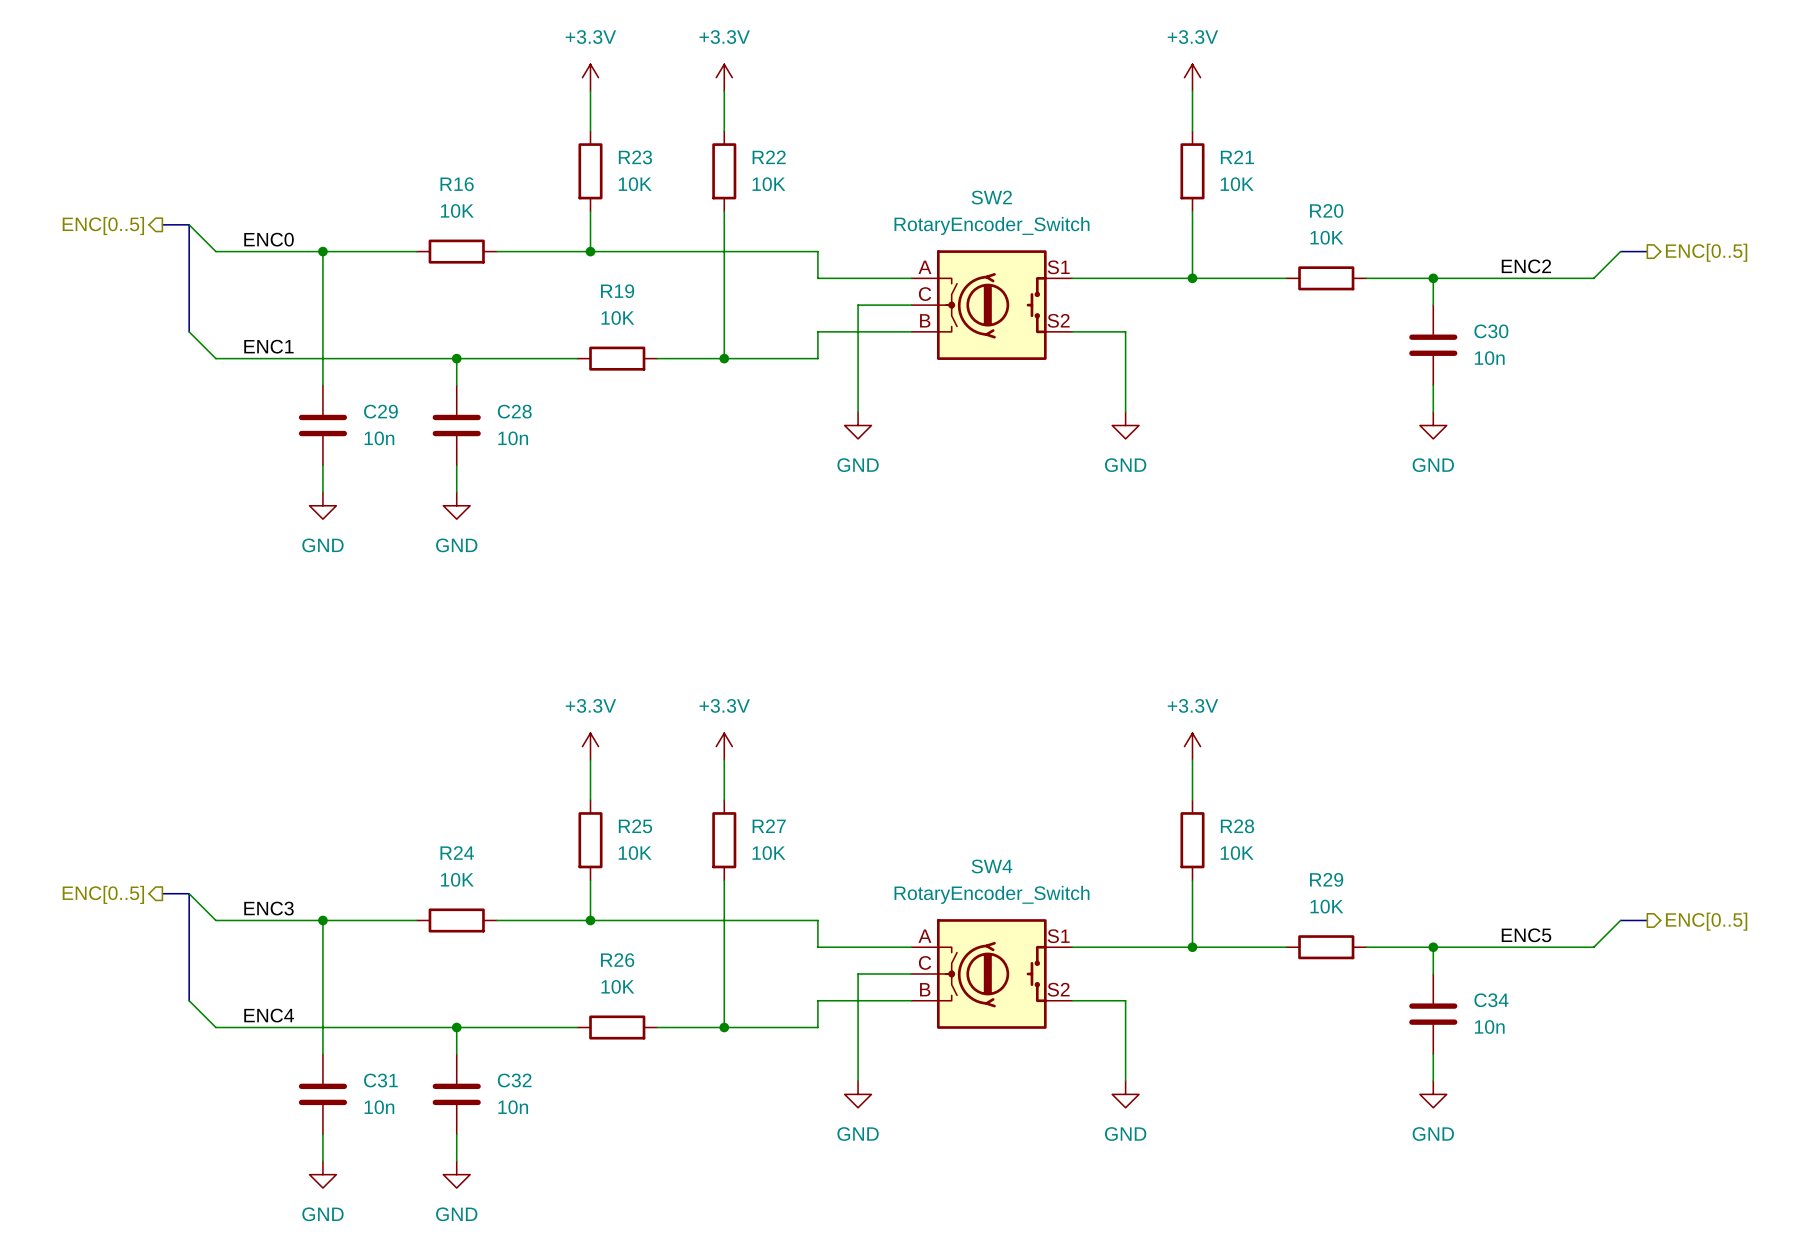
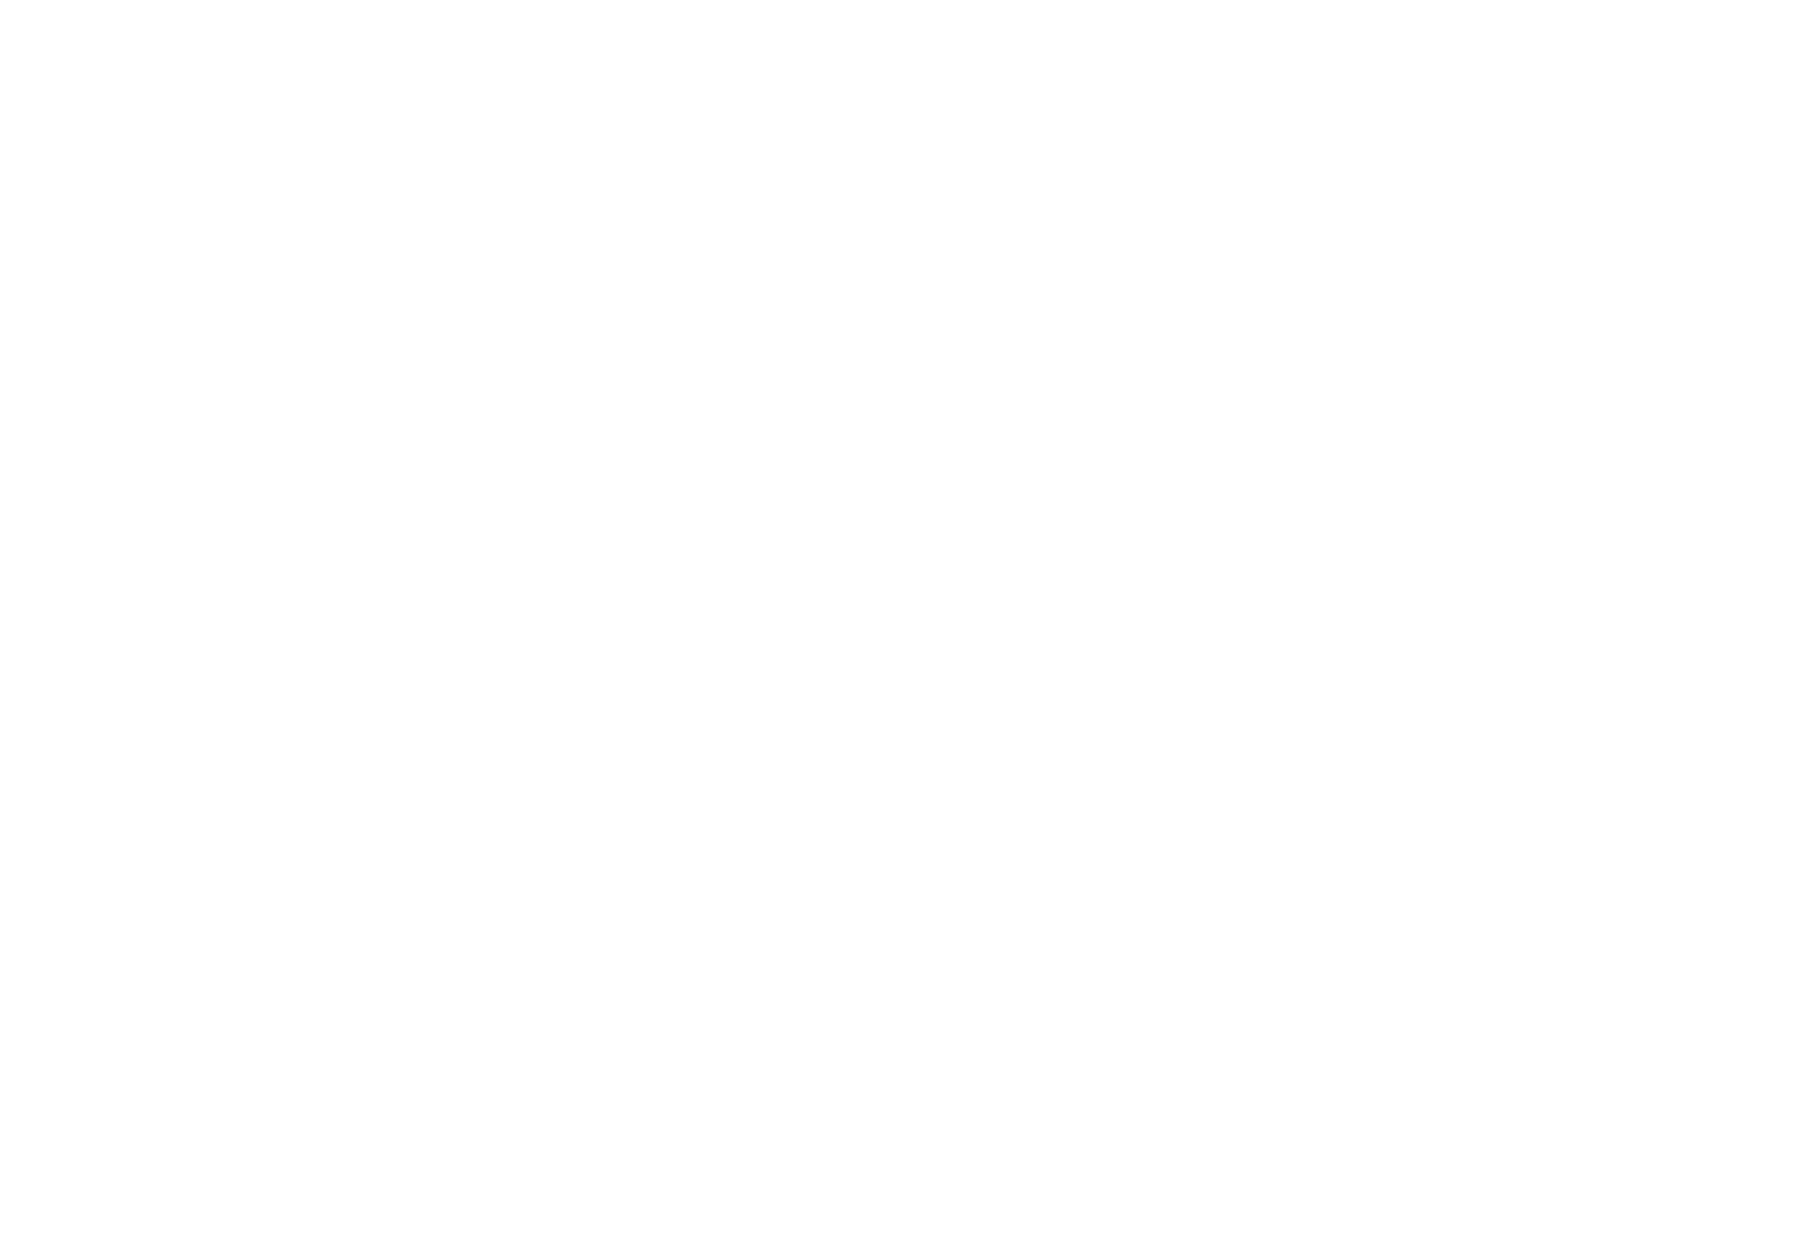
power symbol: +3.3V (590, 77) -> none
power symbol: +3.3V (724, 77) -> none
power symbol: +3.3V (1192, 77) -> none
wire: (590, 91) (590, 131) -> none
wire: (724, 91) (724, 131) -> none
wire: (1192, 91) (1192, 131) -> none
R23: 10K (590, 171) -> none
R22: 10K (724, 171) -> none
R21: 10K (1192, 171) -> none
wire: (590, 211) (590, 251) -> none
wire: (724, 211) (724, 358) -> none
wire: (1192, 211) (1192, 278) -> none
bus: (162, 224) (189, 224) (189, 331) -> none
wire: (189, 224) (215, 251) (416, 251) -> none
hierarchical label: ENC[0..5] (103, 226) -> none
label: ENC0 (269, 239) -> none
wire: (322, 251) (322, 385) -> none
junction: (322, 251) -> none
R16: 10K (456, 251) -> none
wire: (496, 251) (817, 251) (817, 278) (911, 278) -> none
junction: (590, 251) -> none
wire: (1620, 251) (1593, 278) (1366, 278) -> none
bus: (1620, 251) (1647, 251) -> none
hierarchical label: ENC[0..5] (1706, 252) -> none
label: ENC2 (1526, 266) -> none
wire: (1072, 278) (1286, 278) -> none
junction: (1192, 278) -> none
R20: 10K (1326, 278) -> none
wire: (1433, 278) (1433, 305) -> none
junction: (1433, 278) -> none
wire: (911, 305) (858, 305) (858, 412) -> none
SW2: RotaryEncoder_Switch (991, 305) -> none
wire: (189, 331) (215, 358) (577, 358) -> none
wire: (911, 331) (817, 331) (817, 358) (657, 358) -> none
wire: (1072, 331) (1125, 331) (1125, 412) -> none
C30: 10n (1433, 345) -> none
label: ENC1 (268, 346) -> none
wire: (456, 358) (456, 385) -> none
junction: (456, 358) -> none
R19: 10K (617, 358) -> none
junction: (724, 358) -> none
wire: (1433, 385) (1433, 412) -> none
C29: 10n (322, 425) -> none
C28: 10n (456, 425) -> none
power symbol: GND (858, 425) -> none
power symbol: GND (1125, 425) -> none
power symbol: GND (1433, 425) -> none
wire: (322, 465) (322, 492) -> none
wire: (456, 465) (456, 492) -> none
power symbol: GND (322, 505) -> none
power symbol: GND (456, 505) -> none
power symbol: +3.3V (590, 746) -> none
power symbol: +3.3V (724, 746) -> none
power symbol: +3.3V (1192, 746) -> none
wire: (590, 759) (590, 800) -> none
wire: (724, 759) (724, 800) -> none
wire: (1192, 759) (1192, 800) -> none
R25: 10K (590, 840) -> none
R27: 10K (724, 840) -> none
R28: 10K (1192, 840) -> none
wire: (590, 880) (590, 920) -> none
wire: (724, 880) (724, 1027) -> none
wire: (1192, 880) (1192, 947) -> none
bus: (162, 893) (189, 893) (189, 1000) -> none
wire: (189, 893) (215, 920) (416, 920) -> none
hierarchical label: ENC[0..5] (103, 894) -> none
label: ENC3 (268, 908) -> none
wire: (322, 920) (322, 1054) -> none
junction: (322, 920) -> none
R24: 10K (456, 920) -> none
wire: (496, 920) (817, 920) (817, 947) (911, 947) -> none
junction: (590, 920) -> none
wire: (1620, 920) (1593, 947) (1366, 947) -> none
bus: (1620, 920) (1647, 920) -> none
hierarchical label: ENC[0..5] (1706, 921) -> none
label: ENC5 (1526, 935) -> none
wire: (1072, 947) (1286, 947) -> none
junction: (1192, 947) -> none
R29: 10K (1326, 947) -> none
wire: (1433, 947) (1433, 973) -> none
junction: (1433, 947) -> none
wire: (911, 973) (858, 973) (858, 1081) -> none
SW4: RotaryEncoder_Switch (991, 973) -> none
wire: (189, 1000) (215, 1027) (577, 1027) -> none
wire: (911, 1000) (817, 1000) (817, 1027) (657, 1027) -> none
wire: (1072, 1000) (1125, 1000) (1125, 1081) -> none
C34: 10n (1433, 1014) -> none
label: ENC4 (269, 1015) -> none
wire: (456, 1027) (456, 1054) -> none
junction: (456, 1027) -> none
R26: 10K (617, 1027) -> none
junction: (724, 1027) -> none
wire: (1433, 1054) (1433, 1081) -> none
C31: 10n (322, 1094) -> none
C32: 10n (456, 1094) -> none
power symbol: GND (858, 1094) -> none
power symbol: GND (1125, 1094) -> none
power symbol: GND (1433, 1094) -> none
wire: (322, 1134) (322, 1161) -> none
wire: (456, 1134) (456, 1161) -> none
power symbol: GND (322, 1174) -> none
power symbol: GND (456, 1174) -> none

